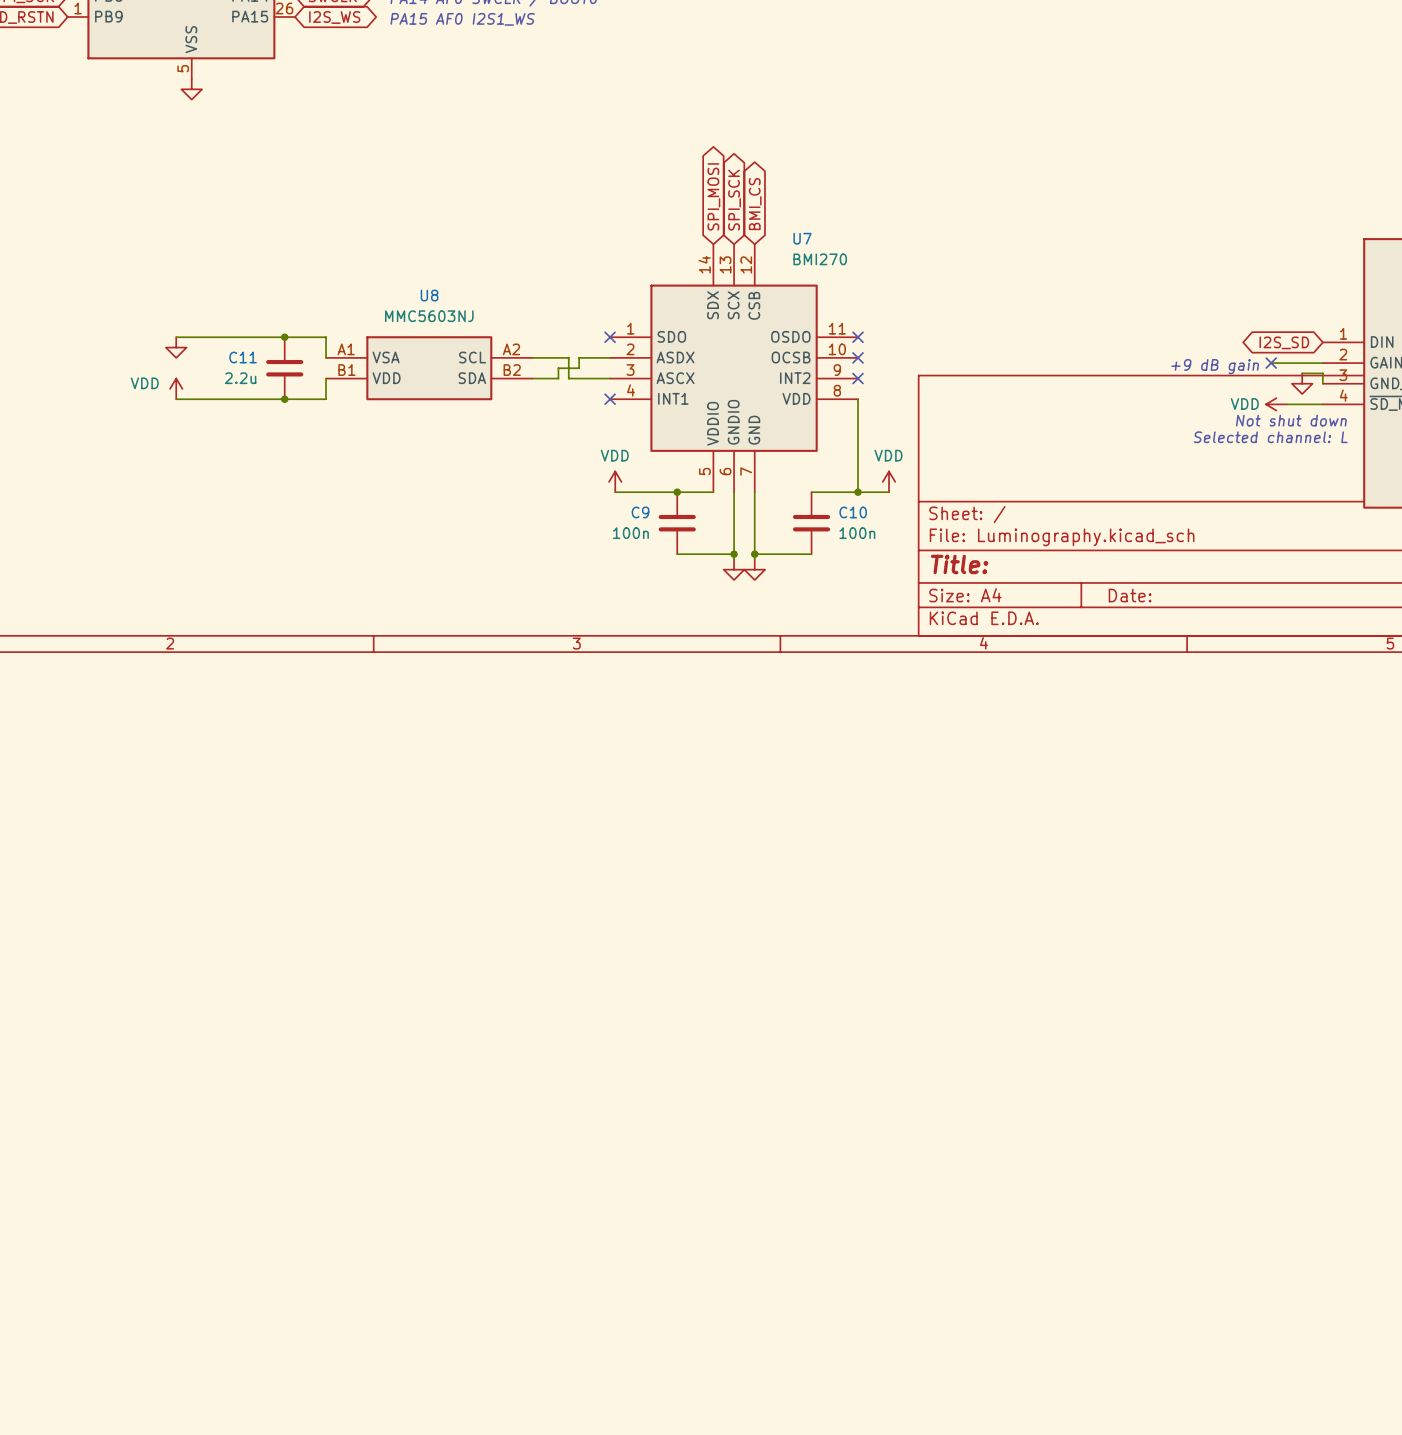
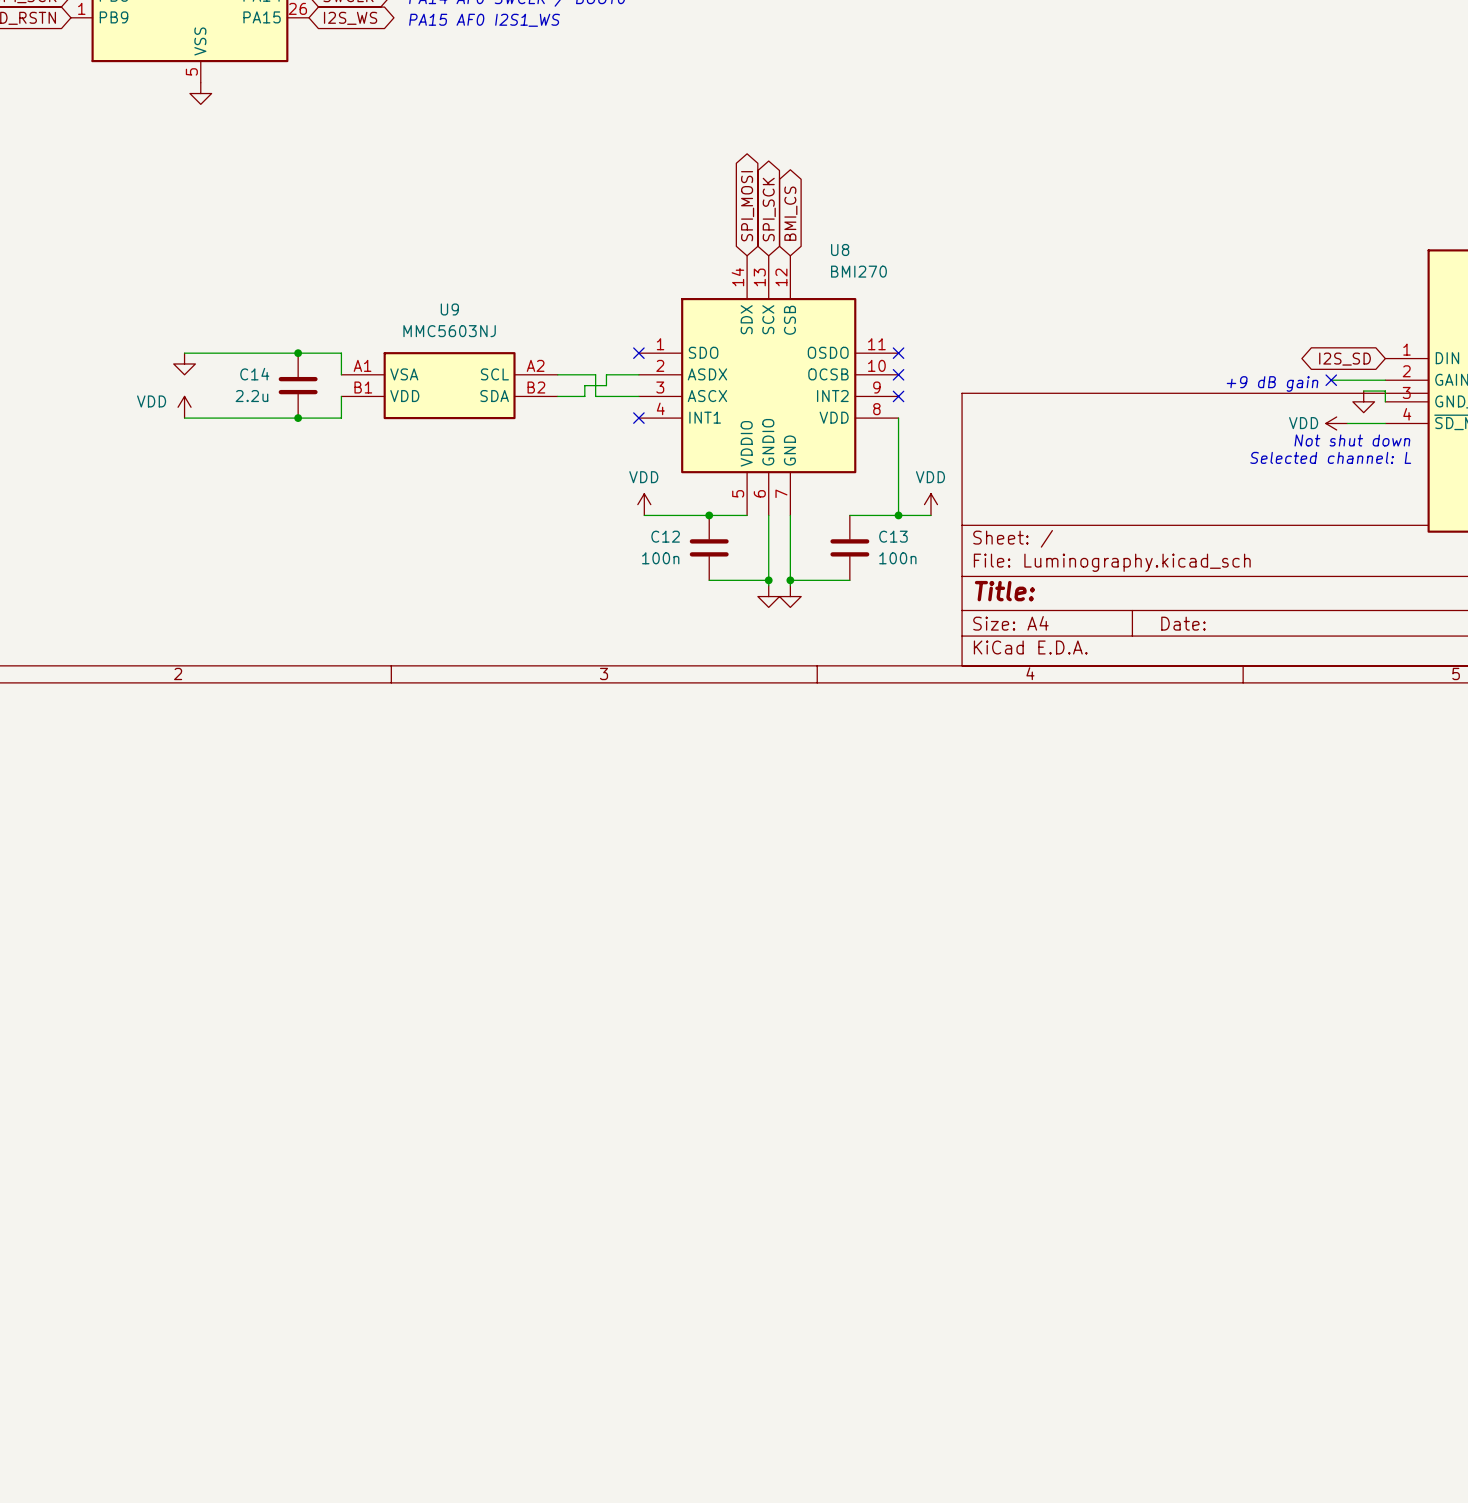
U7 name: U7 (802, 238) -> U8 (840, 249)
U8 name: U8 (429, 295) -> U9 (449, 309)
C11 name: C11 (243, 357) -> C14 (254, 374)
C9 name: C9 (640, 512) -> C12 (665, 536)
C10 name: C10 (853, 512) -> C13 (893, 536)

